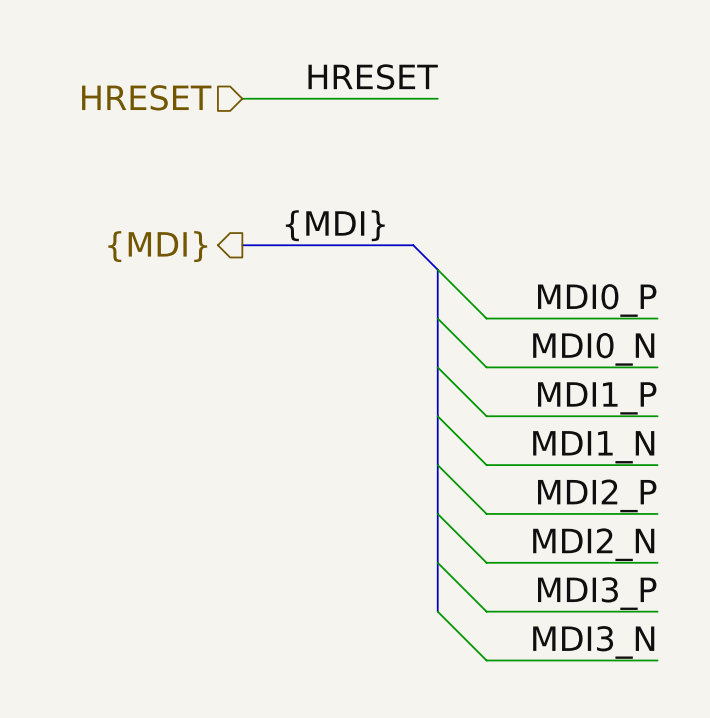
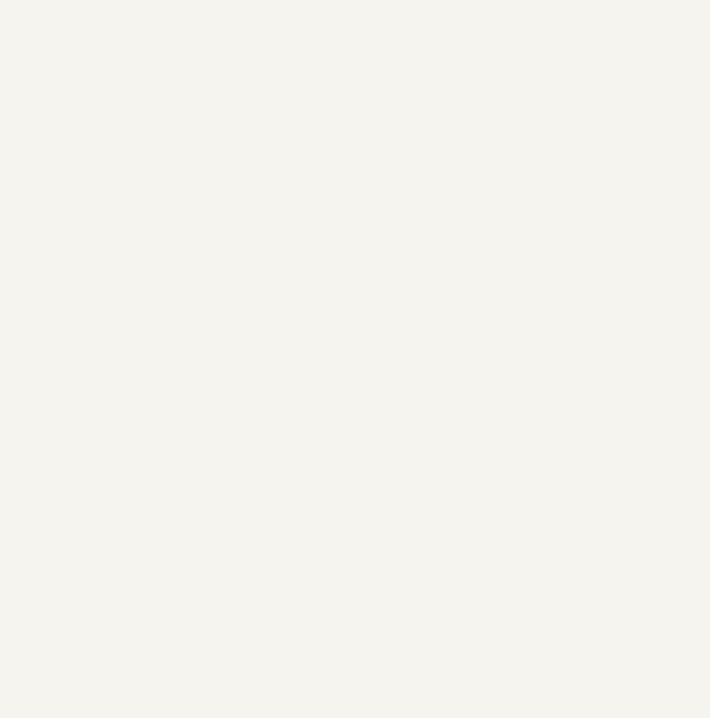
label: HRESET (373, 76) -> none
hierarchical label: HRESET (146, 97) -> none
wire: (242, 98) (437, 98) -> none
label: {MDI} (335, 225) -> none
bus: (242, 245) (413, 245) (437, 269) (437, 611) -> none
hierarchical label: {MDI} (157, 246) -> none
wire: (437, 269) (486, 318) (657, 318) -> none
label: MDI0_P (597, 300) -> none
wire: (437, 318) (486, 367) (657, 367) -> none
label: MDI0_N (593, 349) -> none
wire: (437, 367) (486, 416) (657, 416) -> none
label: MDI1_P (597, 398) -> none
wire: (437, 416) (486, 465) (657, 465) -> none
label: MDI1_N (593, 447) -> none
wire: (437, 465) (486, 513) (657, 513) -> none
label: MDI2_P (597, 495) -> none
wire: (437, 513) (486, 562) (657, 562) -> none
label: MDI2_N (593, 544) -> none
wire: (437, 562) (486, 611) (657, 611) -> none
label: MDI3_P (597, 593) -> none
wire: (437, 611) (486, 660) (657, 660) -> none
label: MDI3_N (593, 642) -> none

